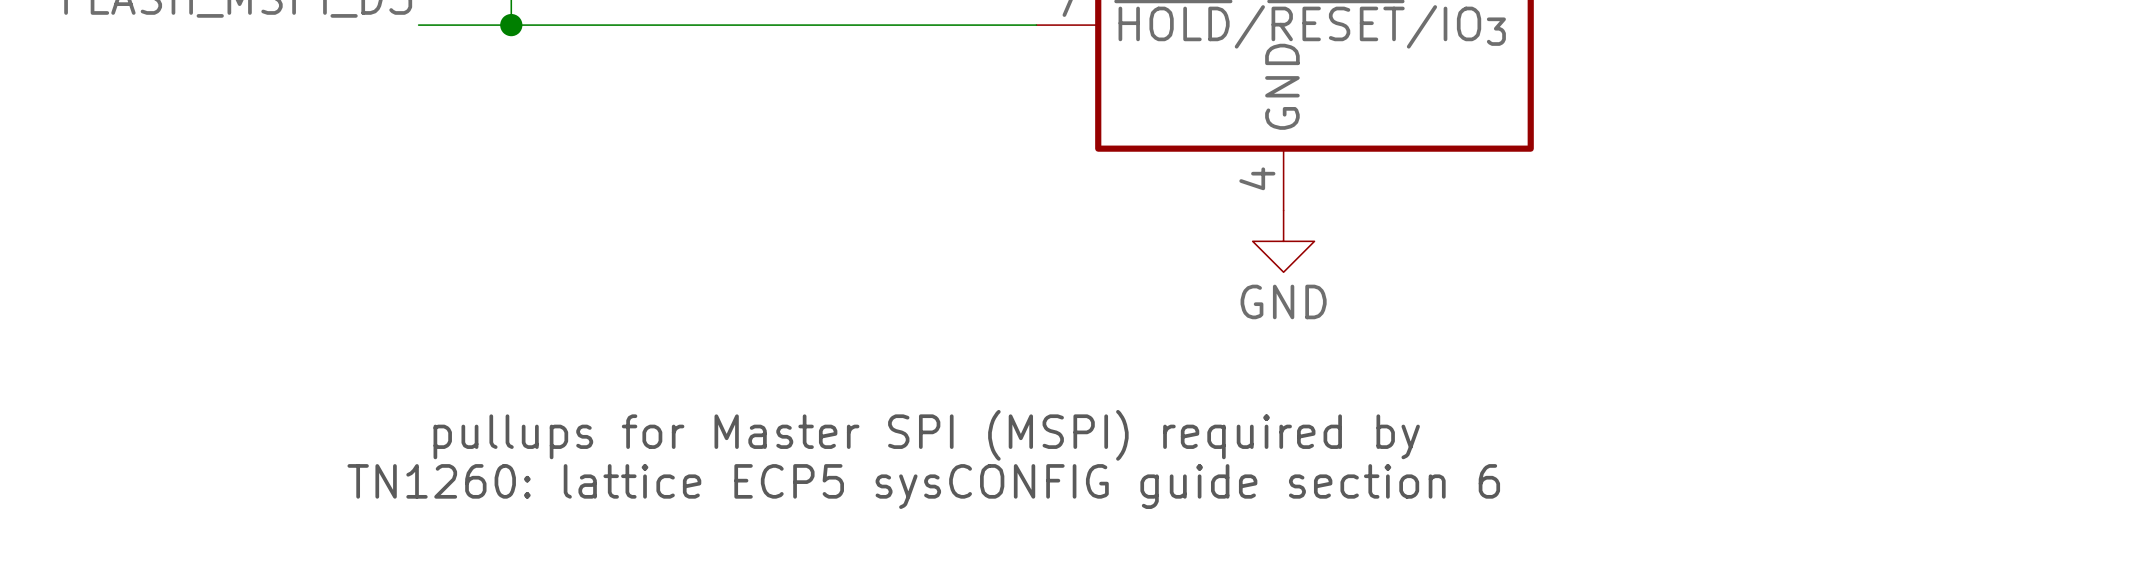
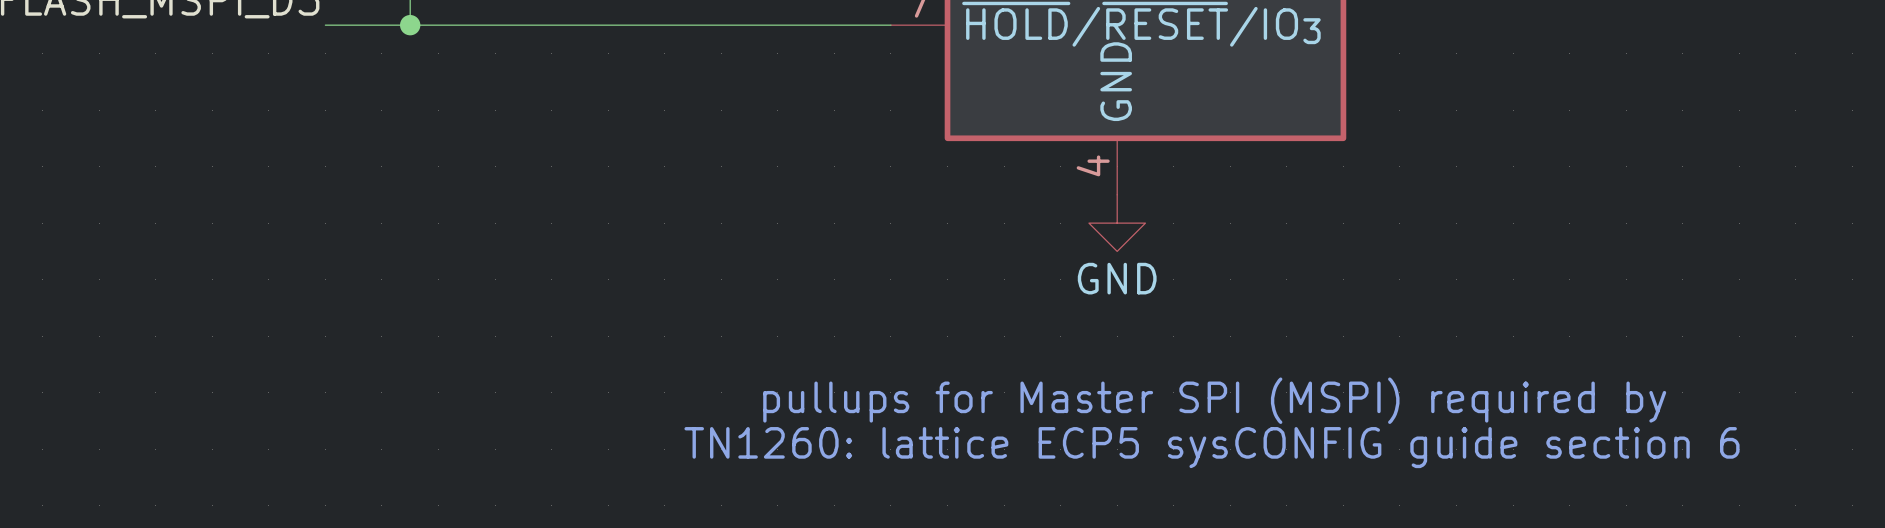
text position: pullups for Master SPI (MSPI) required by (926, 435) -> pullups for Master SPI (MSPI) required by (1214, 400)
text position: TN1260: lattice ECP5 sysCONFIG guide section 6 (923, 486) -> TN1260: lattice ECP5 sysCONFIG guide section 6 (1212, 447)

